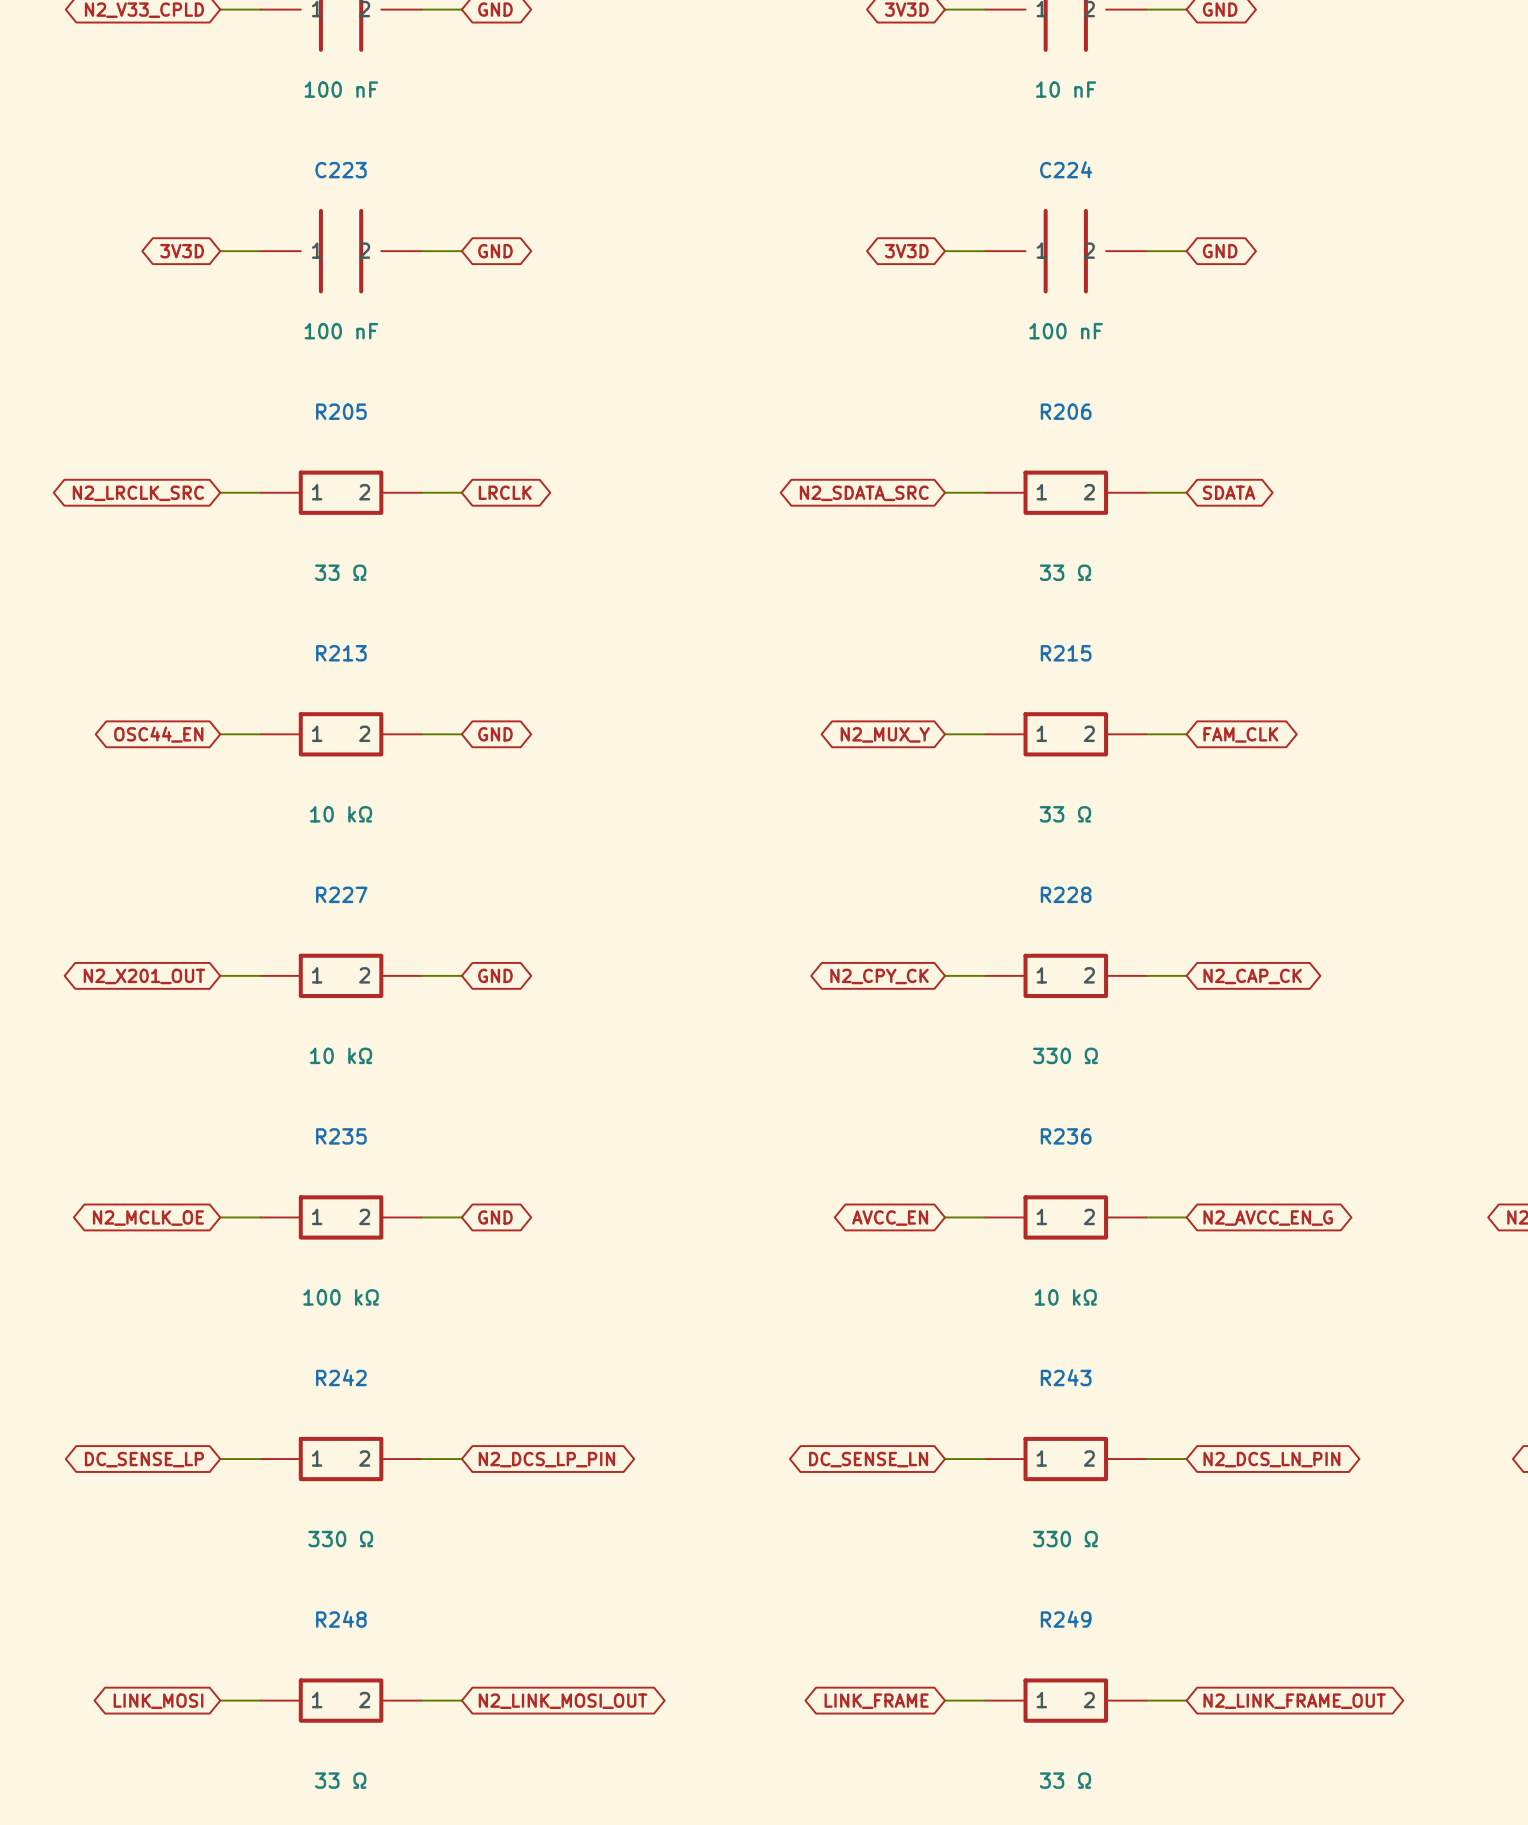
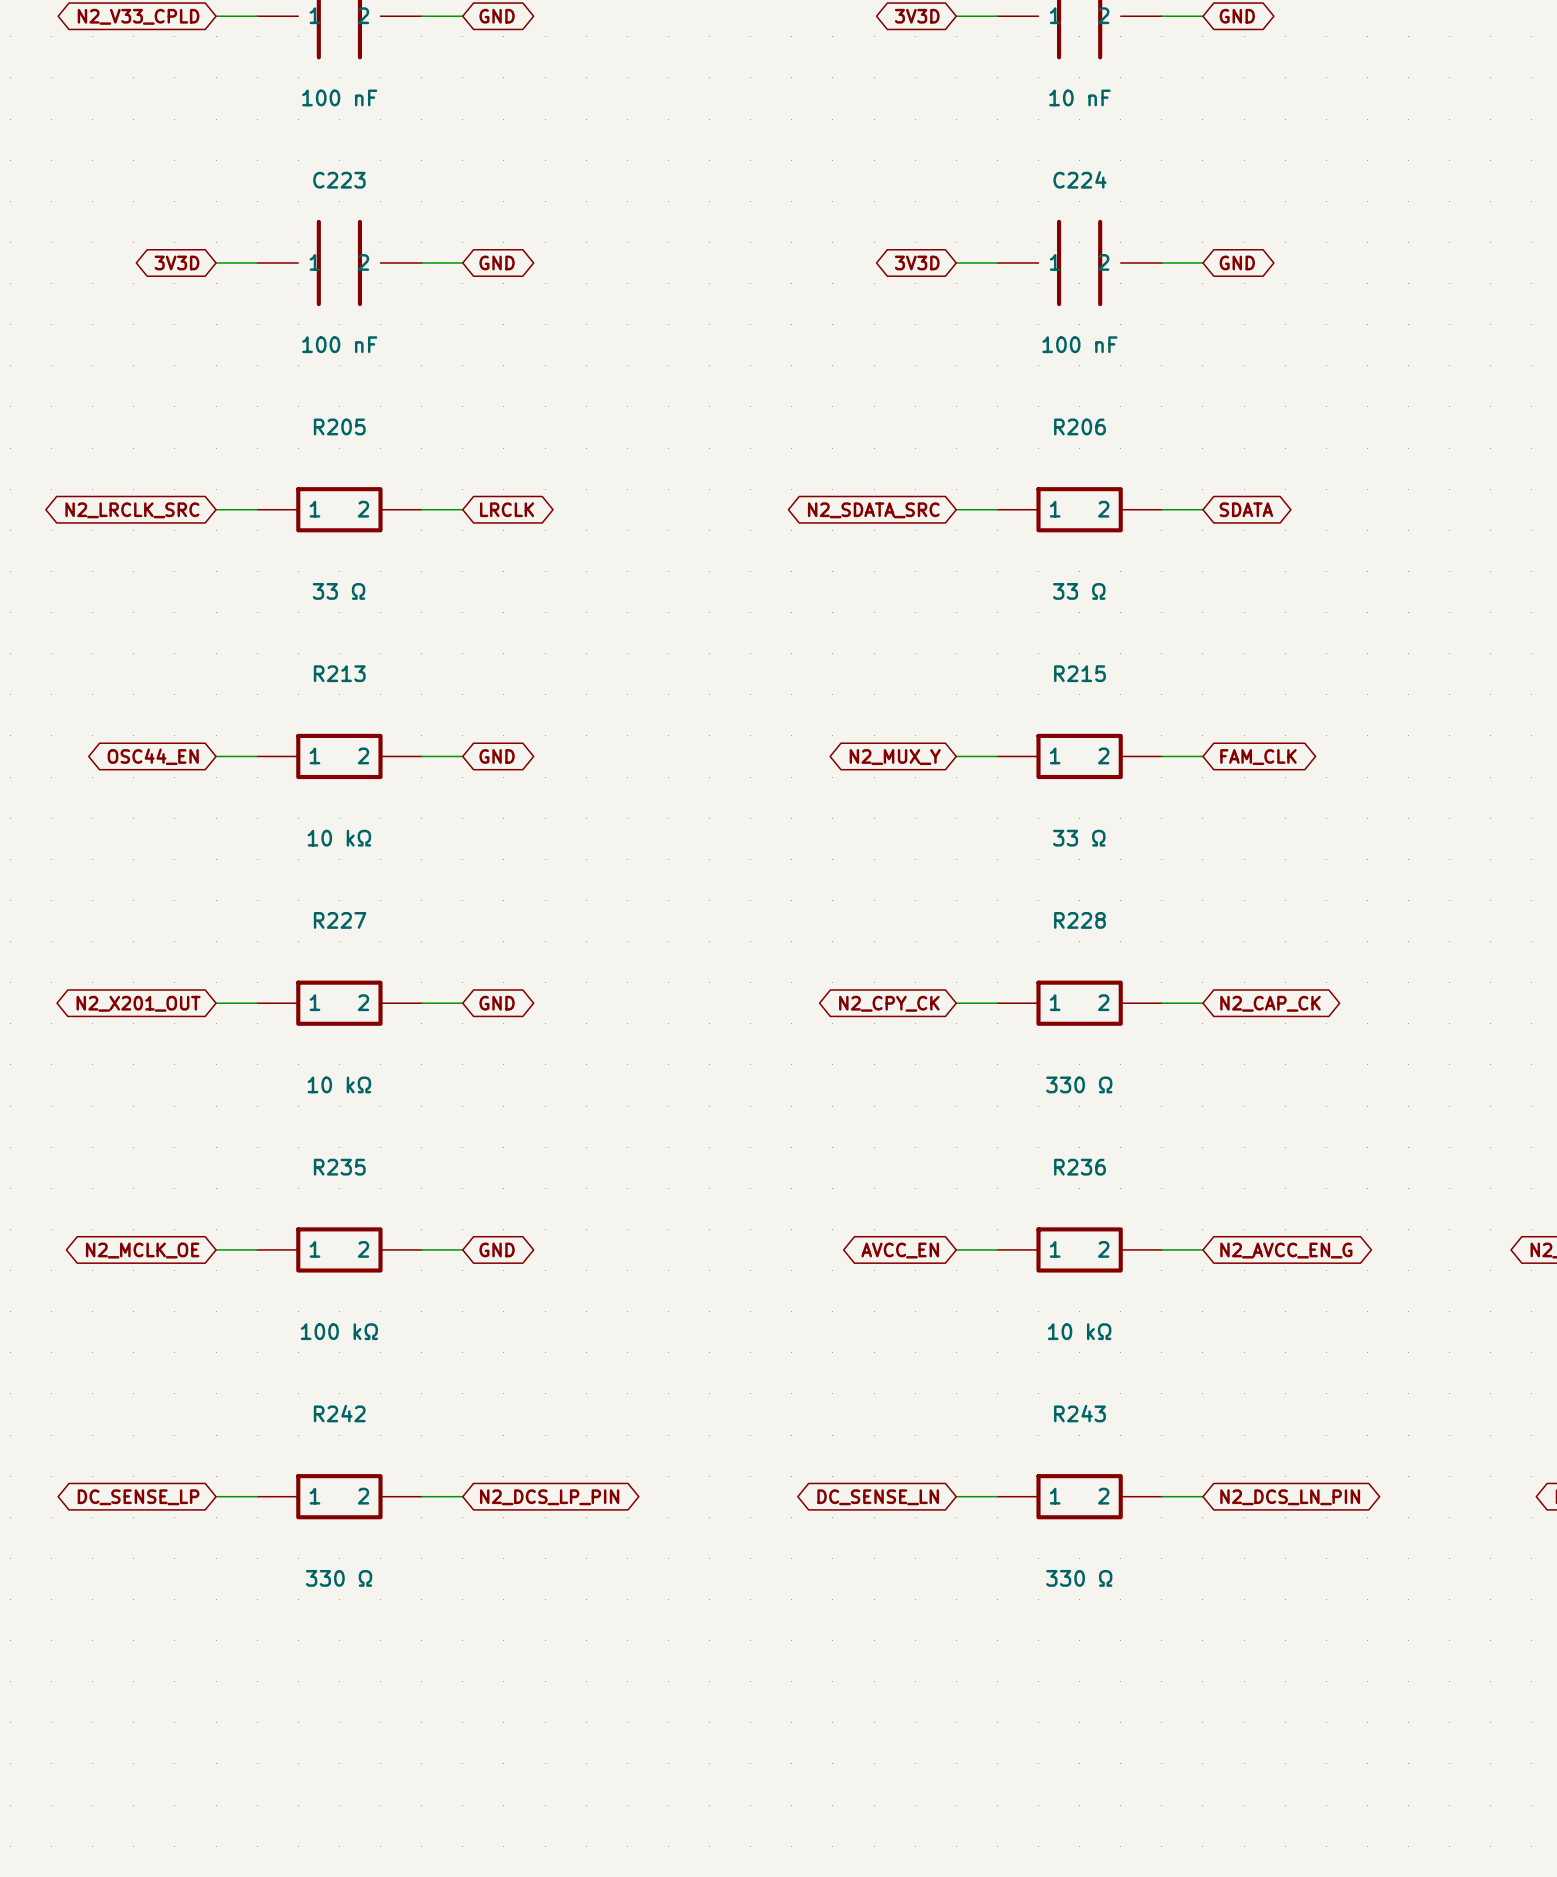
wire: (220, 1700) (260, 1700) -> none
R248: 33 Ω (341, 1700) -> none
wire: (421, 1700) (461, 1700) -> none
wire: (944, 1700) (985, 1700) -> none
R249: 33 Ω (1065, 1700) -> none
wire: (1146, 1700) (1186, 1700) -> none
global label: LINK_MOSI (158, 1701) -> none
global label: N2_LINK_MOSI_OUT (563, 1701) -> none
global label: LINK_FRAME (876, 1701) -> none
global label: N2_LINK_FRAME_OUT (1294, 1701) -> none

